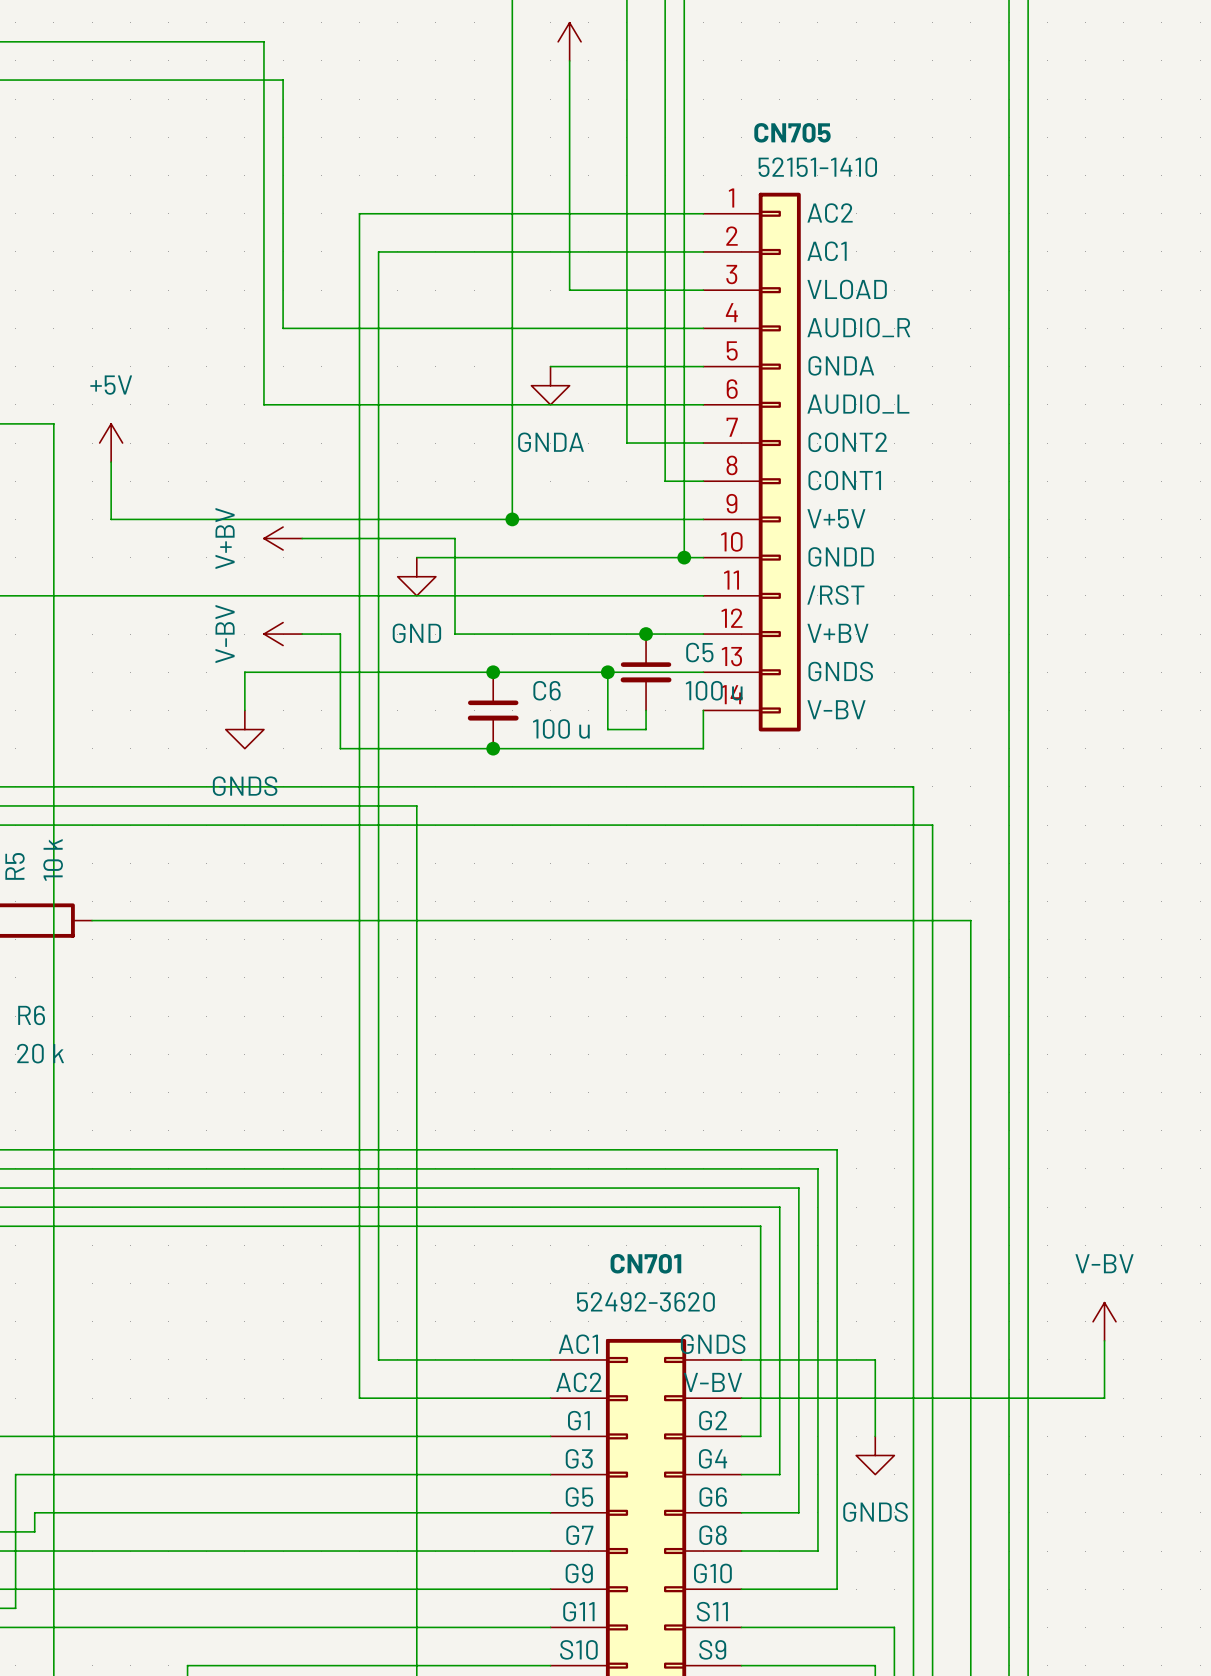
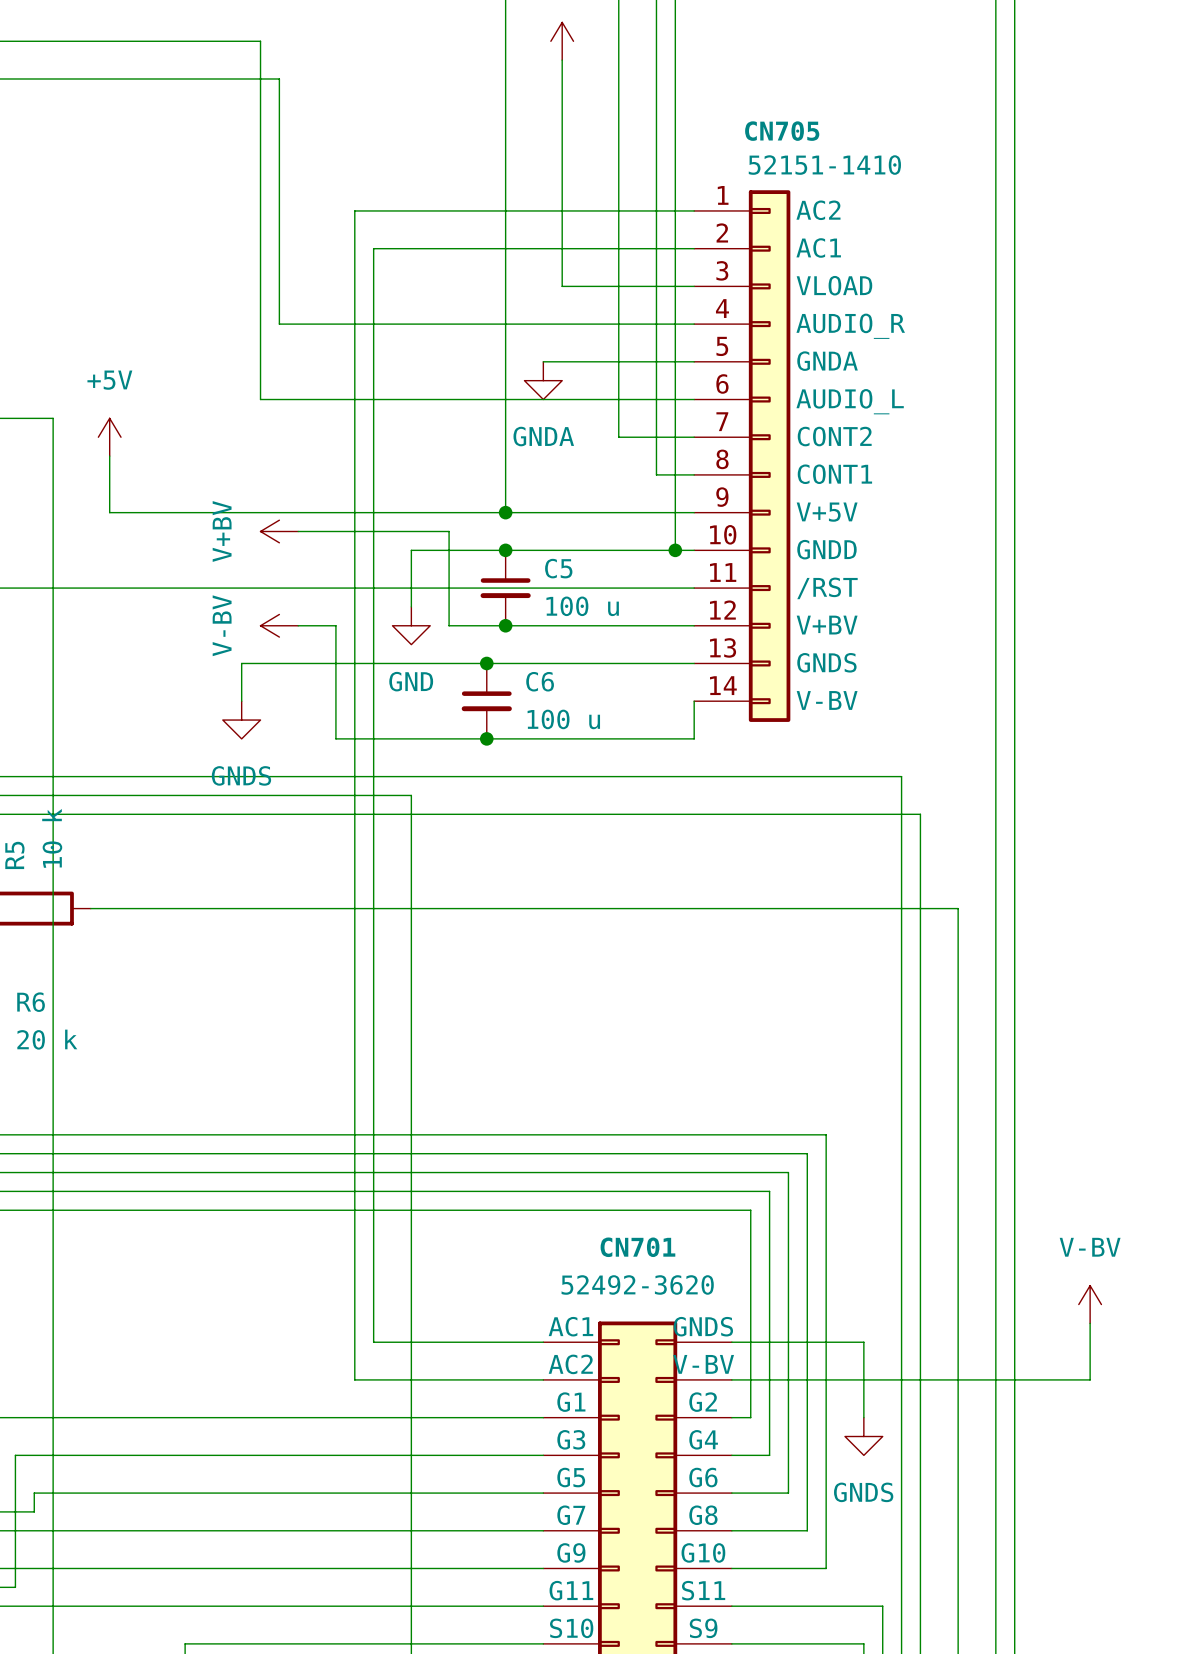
wire: none -> (411, 550) (411, 606)
junction: none -> (505, 550)
power symbol position: GND (416, 576) -> GND (411, 625)
junction: none -> (505, 625)
junction: (646, 634) -> none
wire: (607, 672) (607, 729) (646, 729) (646, 710) -> none
junction: (607, 672) -> none
C5 position: (646, 672) -> (505, 588)

